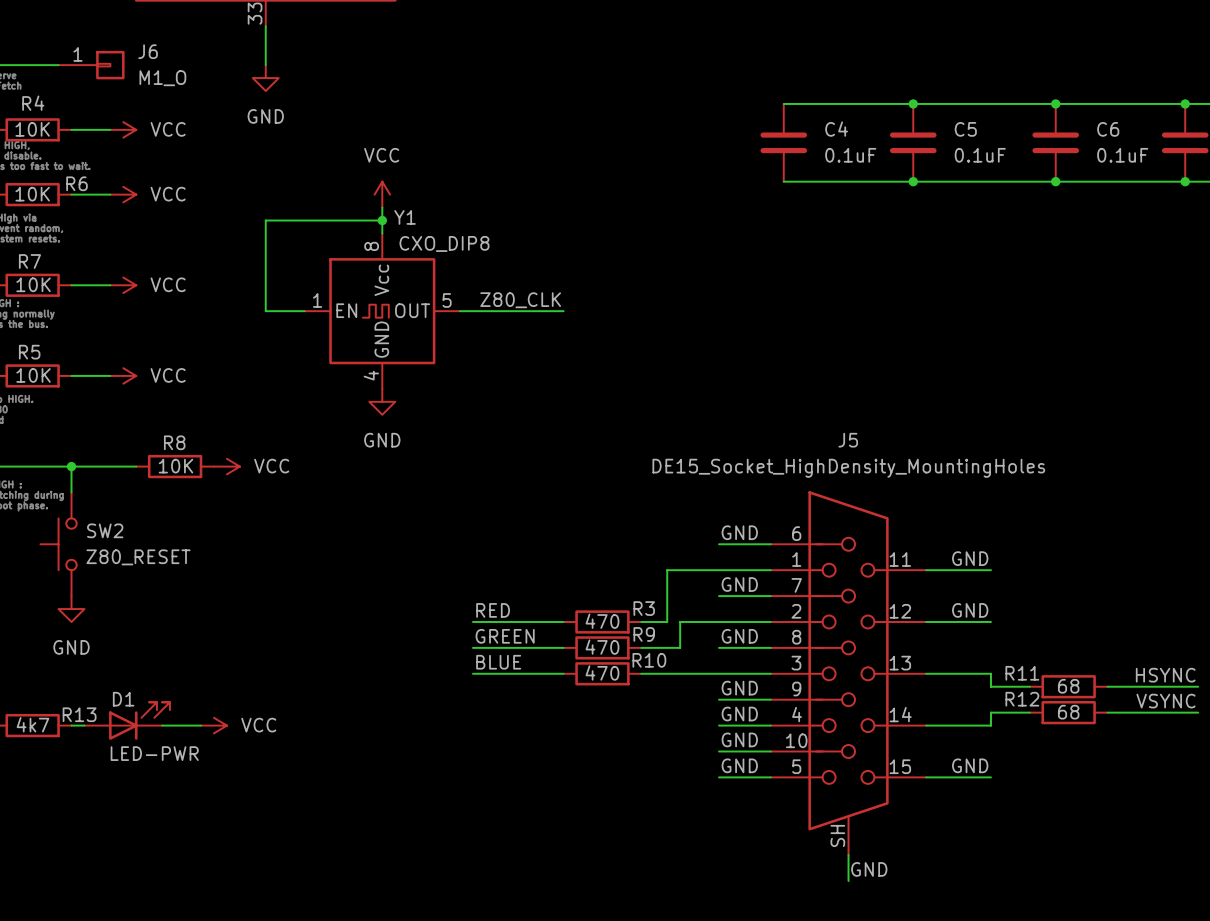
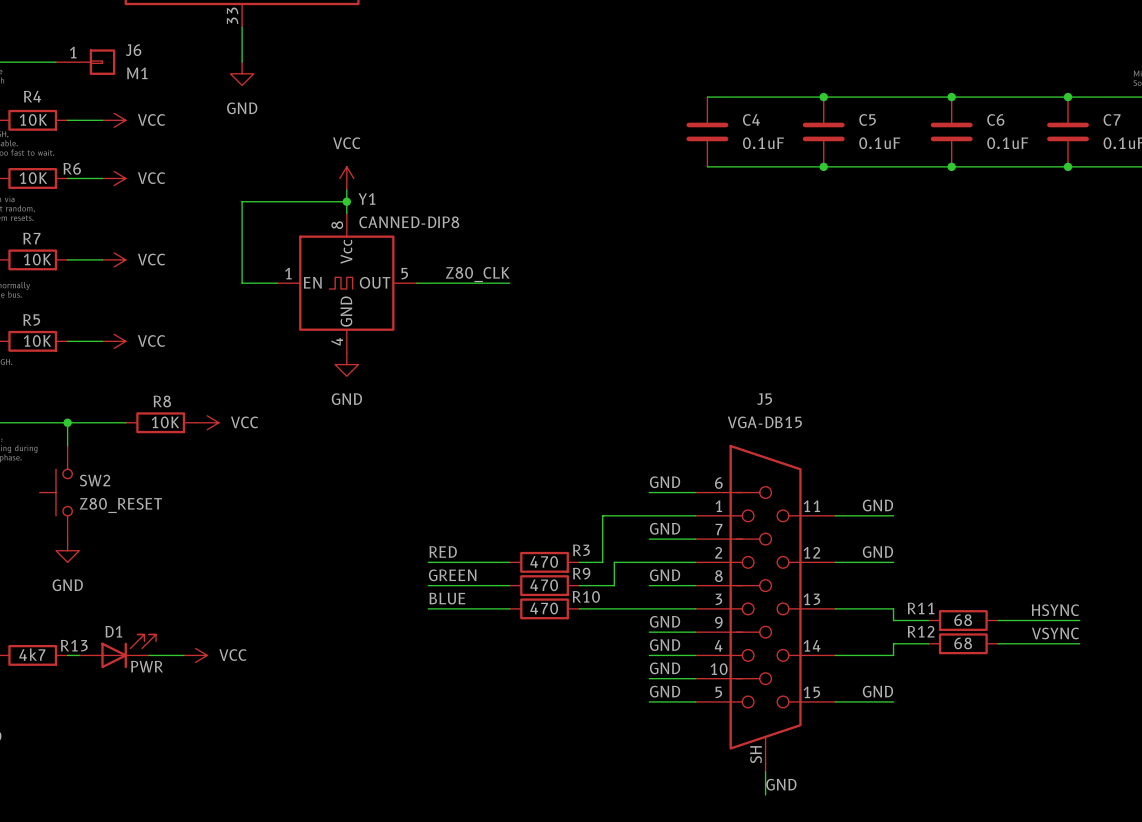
J6 value: M1_O (162, 78) -> M1 (137, 73)
Y1 value: CXO_DIP8 (444, 243) -> CANNED-DIP8 (409, 222)
J5 value: DE15_Socket_HighDensity_MountingHoles (848, 468) -> VGA-DB15 (764, 422)
D1 value: LED-PWR (154, 753) -> PWR (147, 666)

